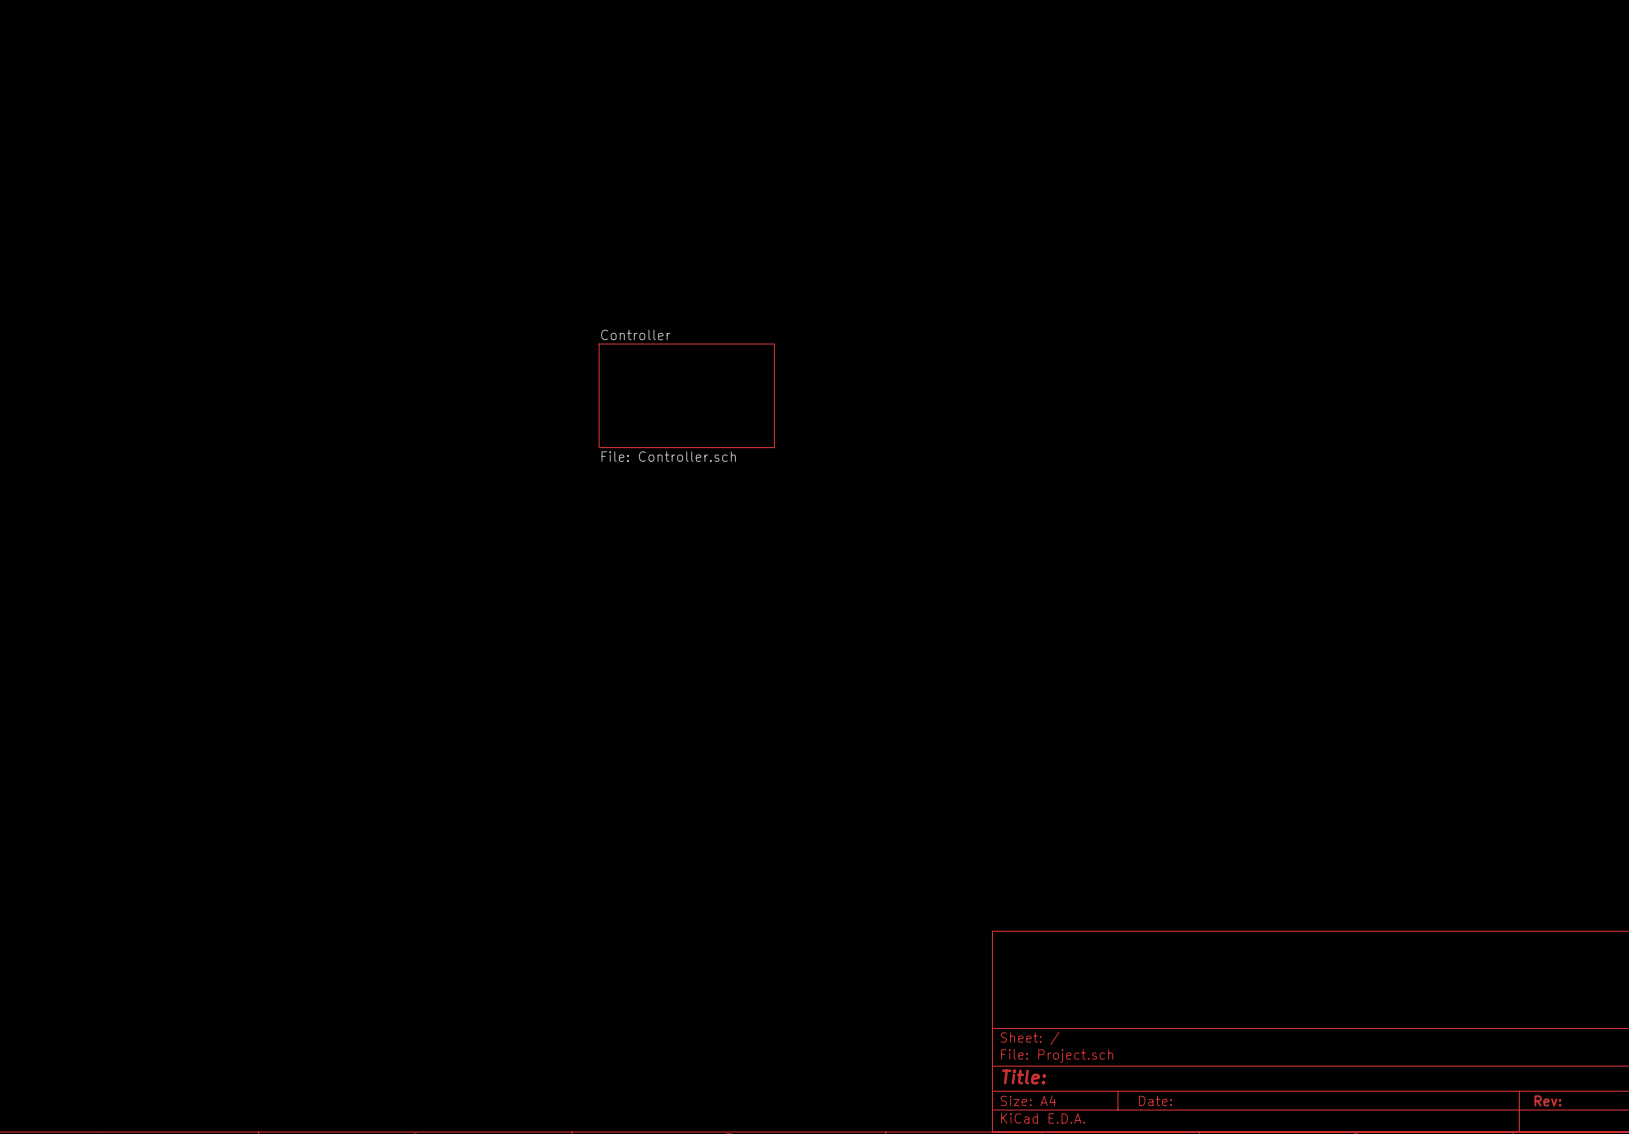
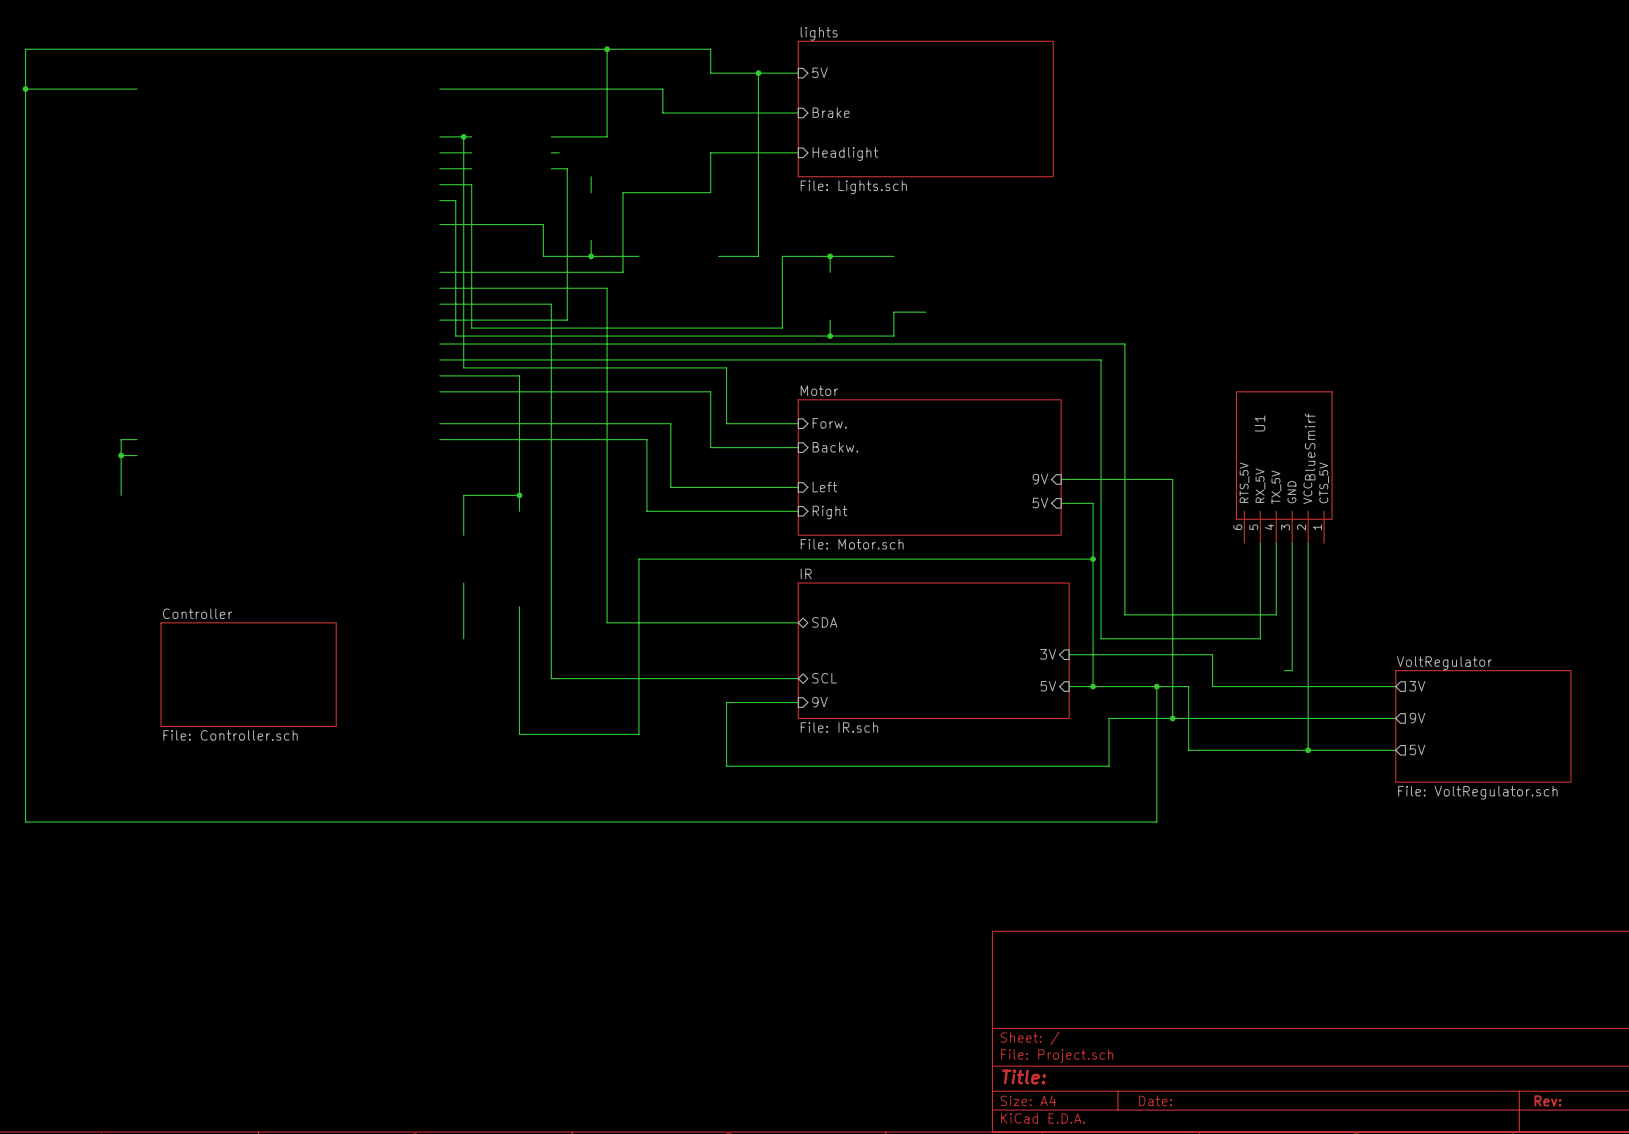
wire: none -> (607, 49) (607, 136) (551, 136)
junction: none -> (607, 49)
sheet pin: none -> 5V (819, 72)
wire: none -> (758, 73) (758, 256) (718, 256)
junction: none -> (758, 73)
wire: none -> (798, 73) (710, 73) (710, 49) (25, 49) (25, 822) (1156, 822) (1156, 686)
wire: none -> (25, 89) (137, 89)
junction: none -> (25, 89)
wire: none -> (439, 89) (662, 89) (662, 112) (798, 112)
sheet lights: none -> File: Lights.sch (925, 109)
sheet pin: none -> Brake (831, 112)
wire: none -> (439, 136) (471, 136)
wire: none -> (463, 136) (463, 367) (726, 367) (726, 423) (798, 423)
junction: none -> (463, 136)
wire: none -> (439, 152) (471, 152)
wire: none -> (551, 152) (559, 152)
wire: none -> (798, 152) (710, 152) (710, 192) (623, 192) (623, 272) (439, 272)
sheet pin: none -> Headlight (845, 154)
wire: none -> (439, 168) (471, 168)
wire: none -> (551, 168) (567, 168) (567, 320) (439, 320)
wire: none -> (591, 176) (591, 192)
wire: none -> (439, 184) (471, 184) (471, 328) (782, 328) (782, 256) (893, 256)
wire: none -> (439, 200) (455, 200) (455, 336) (893, 336) (893, 312) (925, 312)
wire: none -> (439, 224) (543, 224) (543, 256) (638, 256)
wire: none -> (591, 240) (591, 256)
junction: none -> (591, 256)
wire: none -> (830, 256) (830, 272)
junction: none -> (830, 256)
wire: none -> (439, 288) (607, 288) (607, 622) (798, 622)
wire: none -> (439, 304) (551, 304) (551, 678) (798, 678)
wire: none -> (830, 320) (830, 336)
junction: none -> (830, 336)
wire: none -> (439, 344) (1124, 344) (1124, 614) (1276, 614) (1276, 543)
wire: none -> (439, 359) (1101, 359) (1101, 638) (1260, 638) (1260, 543)
wire: none -> (439, 375) (519, 375) (519, 511)
wire: none -> (439, 391) (710, 391) (710, 447) (798, 447)
sheet Controller: File: Controller.sch (686, 395) -> none
wire: none -> (439, 423) (670, 423) (670, 487) (798, 487)
sheet pin: none -> Forw. (829, 423)
wire: none -> (137, 439) (121, 439) (121, 495)
wire: none -> (439, 439) (646, 439) (646, 511) (798, 511)
sheet pin: none -> Backw. (835, 447)
wire: none -> (121, 455) (137, 455)
junction: none -> (121, 455)
sheet Motor: none -> File: Motor.sch (929, 467)
U1: none -> BlueSmirf (1284, 467)
sheet pin: none -> 9V (1040, 479)
wire: none -> (1061, 479) (1172, 479) (1172, 718)
sheet pin: none -> Left (824, 487)
wire: none -> (519, 495) (463, 495) (463, 535)
junction: none -> (519, 495)
sheet pin: none -> 5V (1040, 502)
wire: none -> (1061, 503) (1093, 503) (1093, 686)
sheet pin: none -> Right (829, 512)
wire: none -> (1292, 543) (1292, 670) (1284, 670)
wire: none -> (1308, 543) (1308, 750)
wire: none -> (1093, 559) (638, 559) (638, 734) (519, 734) (519, 606)
junction: none -> (1093, 559)
wire: none -> (463, 583) (463, 638)
sheet pin: none -> SDA (824, 622)
sheet IR: none -> File: IR.sch (933, 650)
sheet pin: none -> 3V (1048, 654)
wire: none -> (1069, 654) (1212, 654) (1212, 686) (1395, 686)
sheet Controller: none -> File: Controller.sch (248, 674)
sheet pin: none -> SCL (824, 678)
sheet pin: none -> 5V (1048, 686)
wire: none -> (1069, 686) (1188, 686) (1188, 750) (1395, 750)
junction: none -> (1093, 686)
junction: none -> (1156, 686)
sheet pin: none -> 3V (1417, 686)
wire: none -> (798, 702) (726, 702) (726, 766) (1108, 766) (1108, 718) (1395, 718)
sheet pin: none -> 9V (819, 702)
junction: none -> (1172, 718)
sheet pin: none -> 9V (1417, 718)
sheet VoltRegulator: none -> File: VoltRegulator.sch (1483, 726)
sheet pin: none -> 5V (1417, 749)
junction: none -> (1308, 750)

